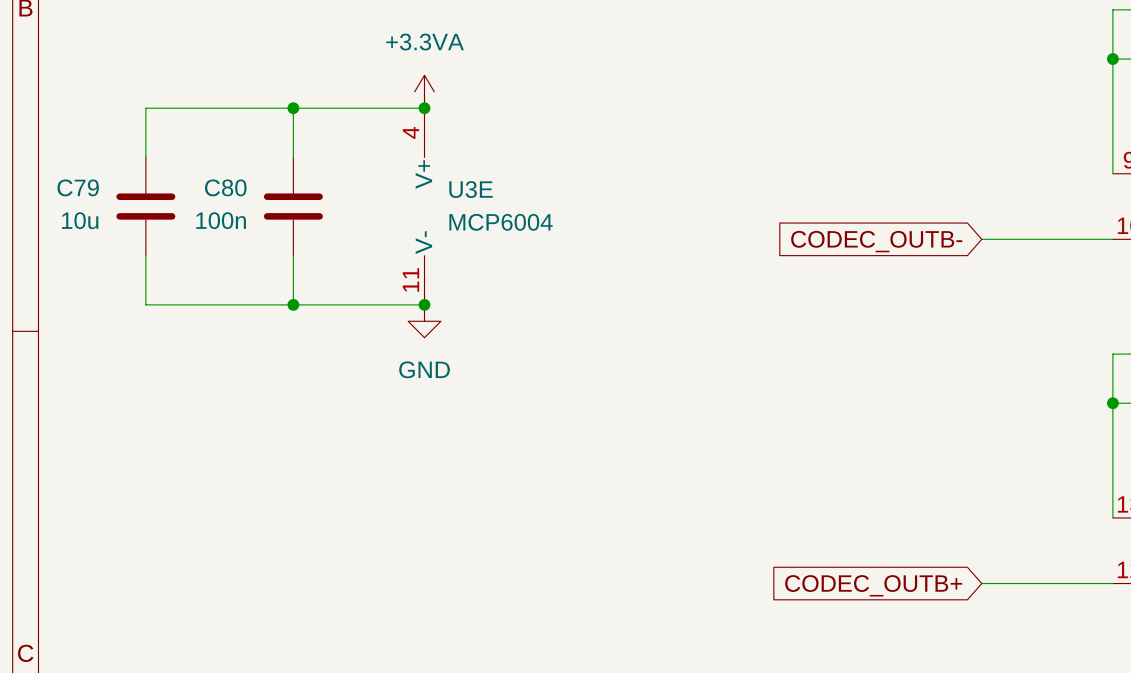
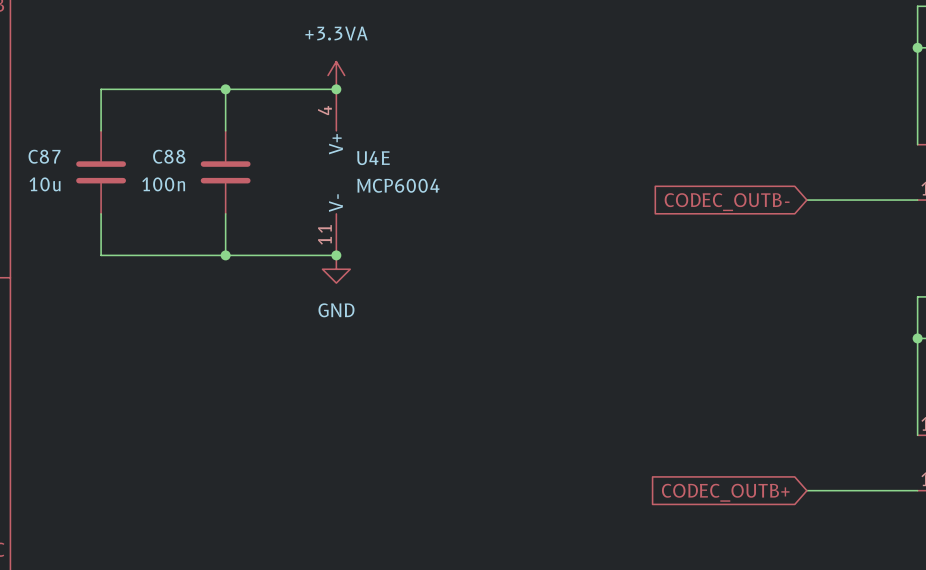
C79 name: C79 (78, 187) -> C87 (44, 156)
C80 name: C80 (225, 187) -> C88 (169, 156)
U3E name: U3E (471, 189) -> U4E (373, 158)

